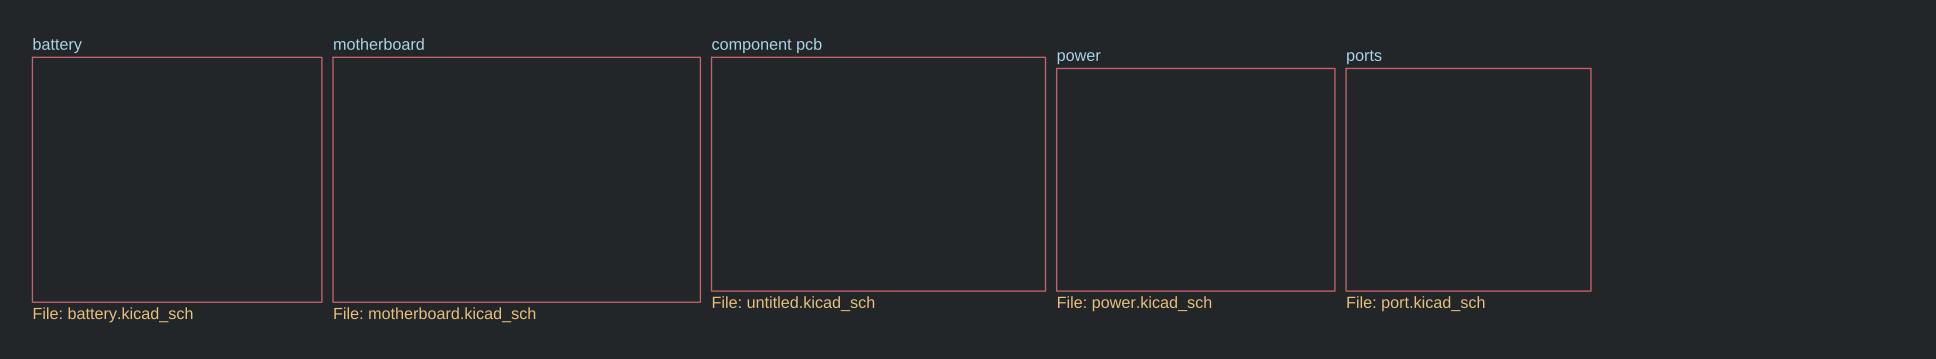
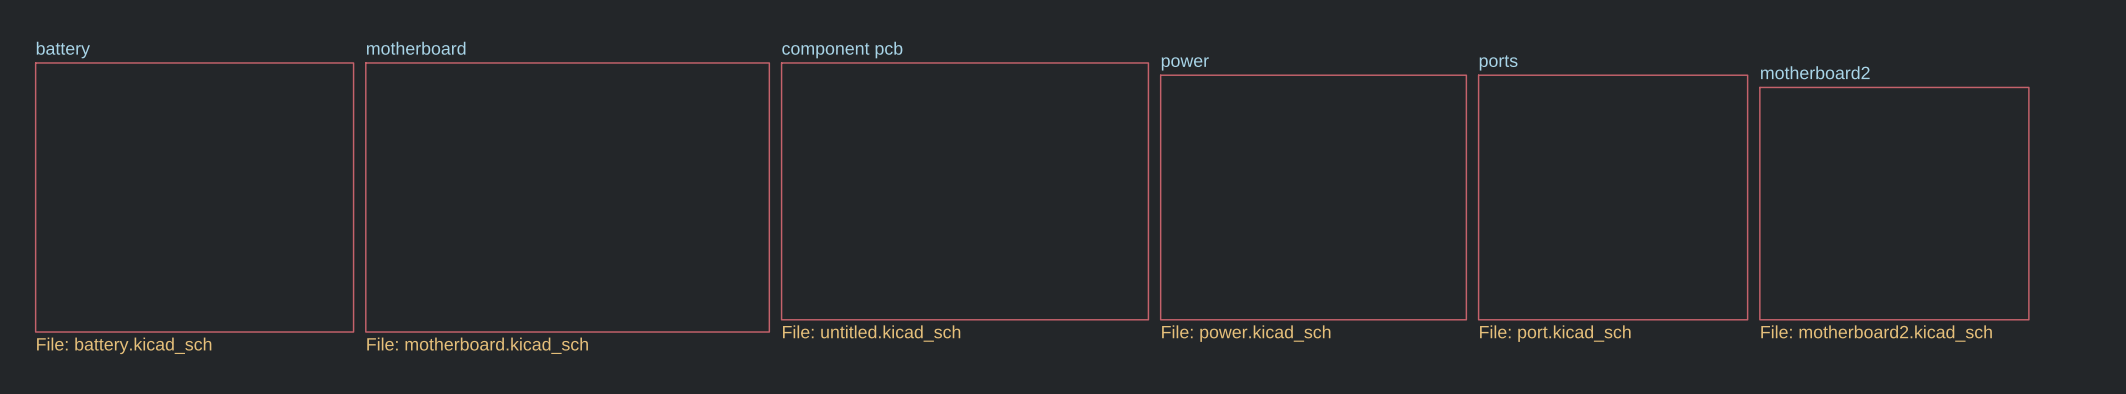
sheet motherboard2: none -> File: motherboard2.kicad_sch (1894, 203)

